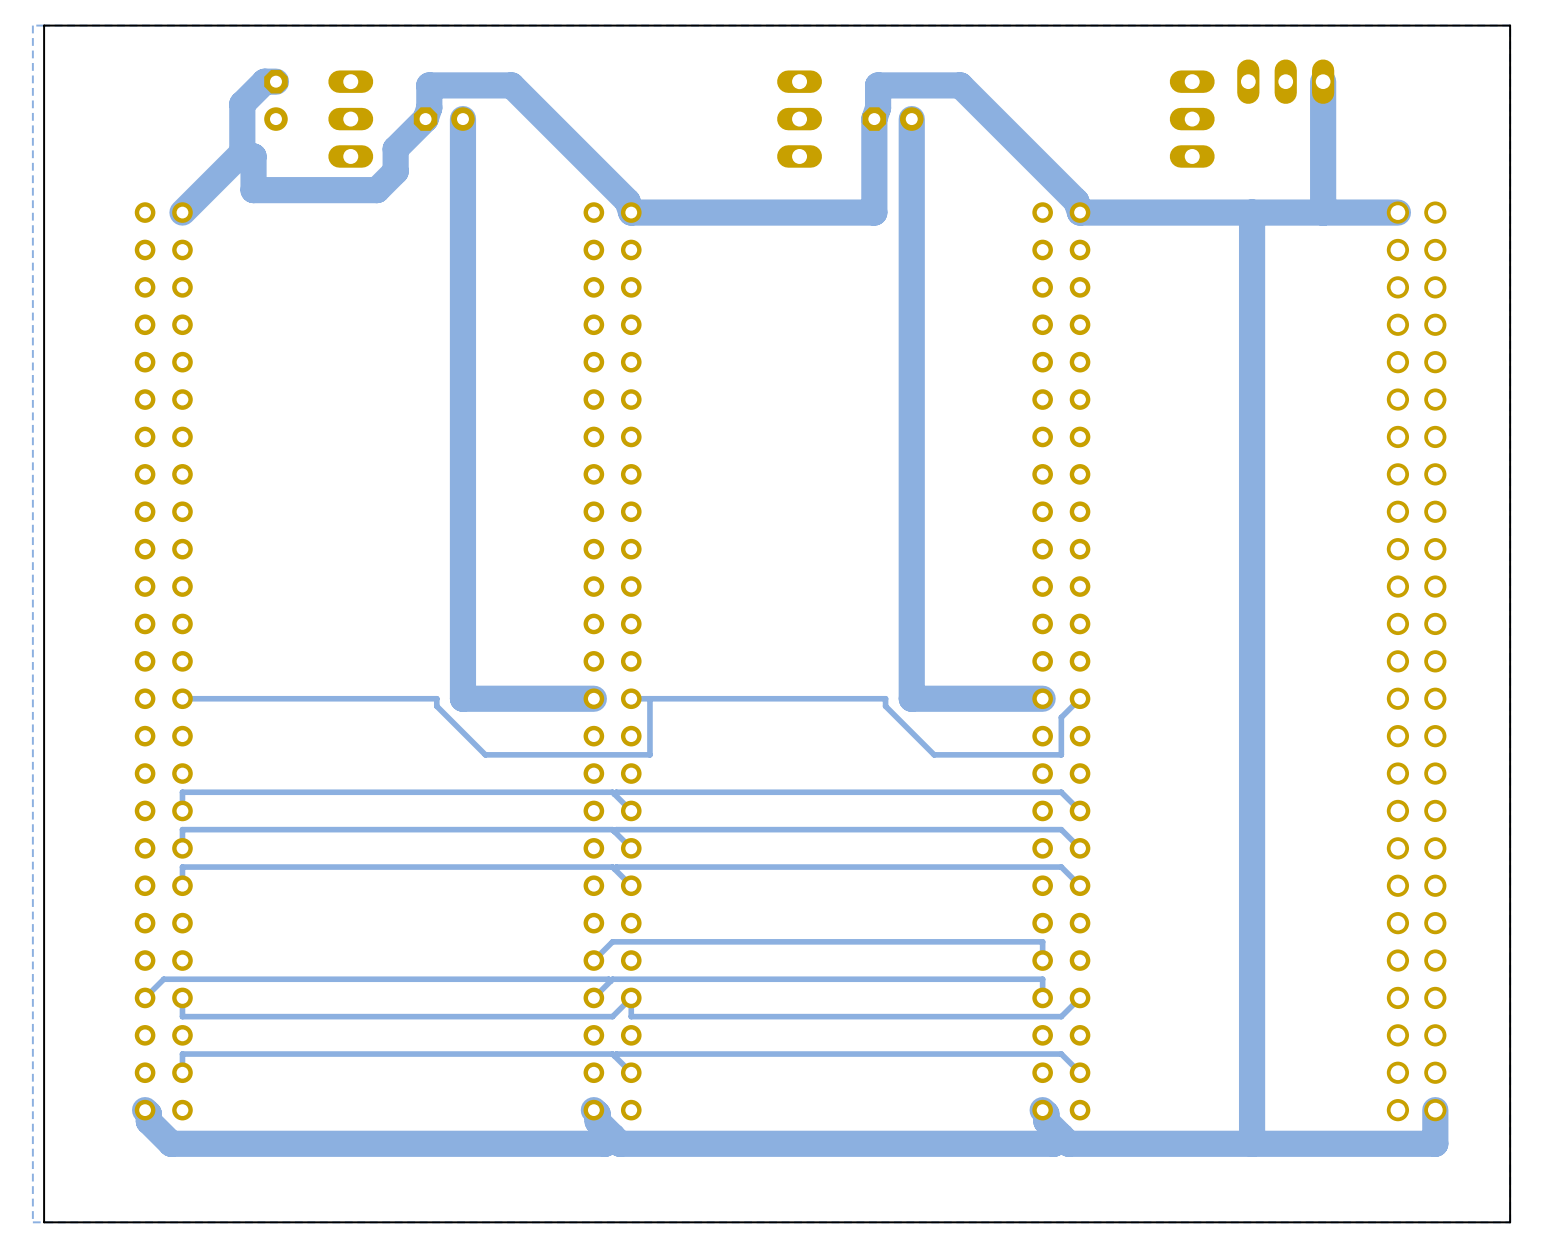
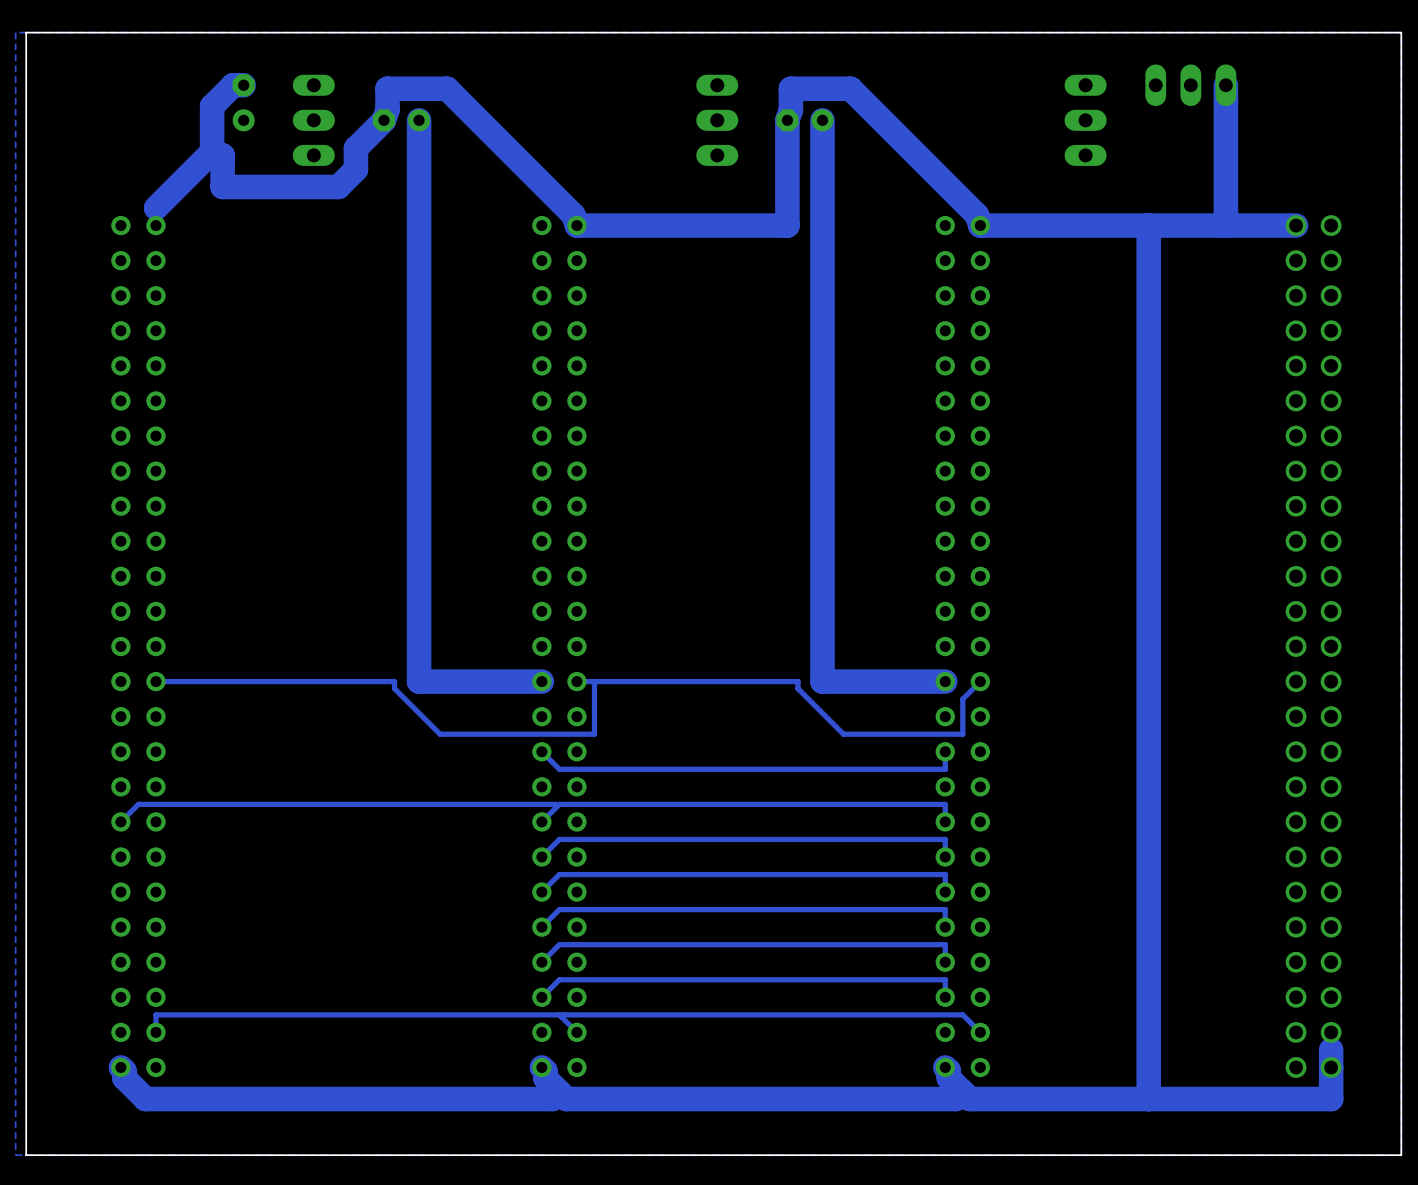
track: (878, 85) (878, 107) (874, 119) (874, 212) (631, 212) (627, 201) (511, 85) (492, 85) -> (808, 88) (790, 88) (790, 109) (787, 120) (787, 225) (576, 225) (573, 215) (447, 88)
track: (922, 85) (960, 85) (1076, 201) (1080, 212) (1397, 212) -> (850, 88) (976, 215) (980, 225) (1296, 225)
part position: (799, 119) -> (717, 120)
track: none -> (822, 120) (822, 681) (945, 681)
part position: (893, 119) -> (804, 120)
track: (911, 119) (911, 698) (1042, 698) -> none
part position: (1192, 119) -> (1085, 120)
track: (1252, 212) (1252, 1143) -> (1148, 225) (1148, 1099)
part position: (163, 661) -> (138, 646)
part position: (612, 661) -> (559, 646)
part position: (1061, 661) -> (962, 646)
part position: (1416, 661) -> (1313, 646)
track: (182, 698) (436, 698) (436, 706) (485, 754) (649, 754) -> (155, 681) (394, 681) (394, 688) (440, 734) (594, 734) (594, 716)
track: (593, 698) (462, 698) -> (541, 681) (419, 681) (419, 664)
track: (649, 698) (649, 717) -> none
track: (1080, 698) (1061, 717) (1061, 754) (934, 754) (885, 706) (885, 698) (631, 698) -> none
track: none -> (980, 681) (962, 699) (962, 734) (843, 734) (797, 688) (797, 681) (576, 681)
track: none -> (945, 751) (945, 769) (559, 769) (541, 751)
track: (614, 794) (616, 792) (1061, 792) (1080, 810) -> none
track: (631, 810) (612, 792) (182, 792) (182, 810) -> none
track: (614, 831) (616, 829) (1061, 829) (1080, 848) -> none
track: (631, 848) (612, 829) (182, 829) (182, 848) -> none
track: none -> (945, 821) (945, 804) (559, 804) (541, 821)
track: (614, 868) (616, 867) (1061, 867) (1080, 885) -> none
track: (631, 885) (612, 867) (182, 867) (182, 885) -> none
track: none -> (945, 857) (945, 839) (559, 839) (541, 857)
track: none -> (945, 892) (945, 874) (559, 874) (541, 892)
track: (1042, 960) (1042, 941) (612, 941) (593, 960) -> none
track: none -> (945, 927) (945, 909) (559, 909) (541, 927)
track: (610, 981) (608, 979) (163, 979) (145, 997) -> (557, 806) (555, 804) (138, 804) (120, 821)
track: (1042, 997) (1042, 979) (612, 979) (593, 997) -> none
track: (1080, 997) (1061, 1016) (631, 1016) (631, 997) (612, 1016) (182, 1016) (182, 997) -> none
track: none -> (945, 962) (945, 944) (559, 944) (541, 962)
track: none -> (945, 997) (945, 979) (559, 979) (541, 997)
track: (614, 1055) (616, 1054) (1061, 1054) (1080, 1072) -> none
track: (631, 1072) (612, 1054) (182, 1054) (182, 1072) -> (576, 1032) (559, 1014) (155, 1014) (155, 1032)
track: none -> (561, 1016) (562, 1014) (962, 1014) (980, 1032)
track: (145, 1110) (148, 1113) (148, 1121) (171, 1143) (605, 1143) (612, 1136) -> (120, 1067) (124, 1070) (124, 1078) (145, 1099) (552, 1099) (559, 1092)
track: (593, 1110) (597, 1113) (597, 1121) (620, 1143) (1053, 1143) (1061, 1136) -> none
track: (1042, 1110) (1046, 1113) (1046, 1121) (1068, 1143) (1435, 1143) -> (945, 1067) (948, 1070) (948, 1078) (969, 1099) (1331, 1099) (1331, 1081)
track: none -> (541, 1067) (545, 1070) (545, 1078) (566, 1099) (955, 1099) (962, 1092)

